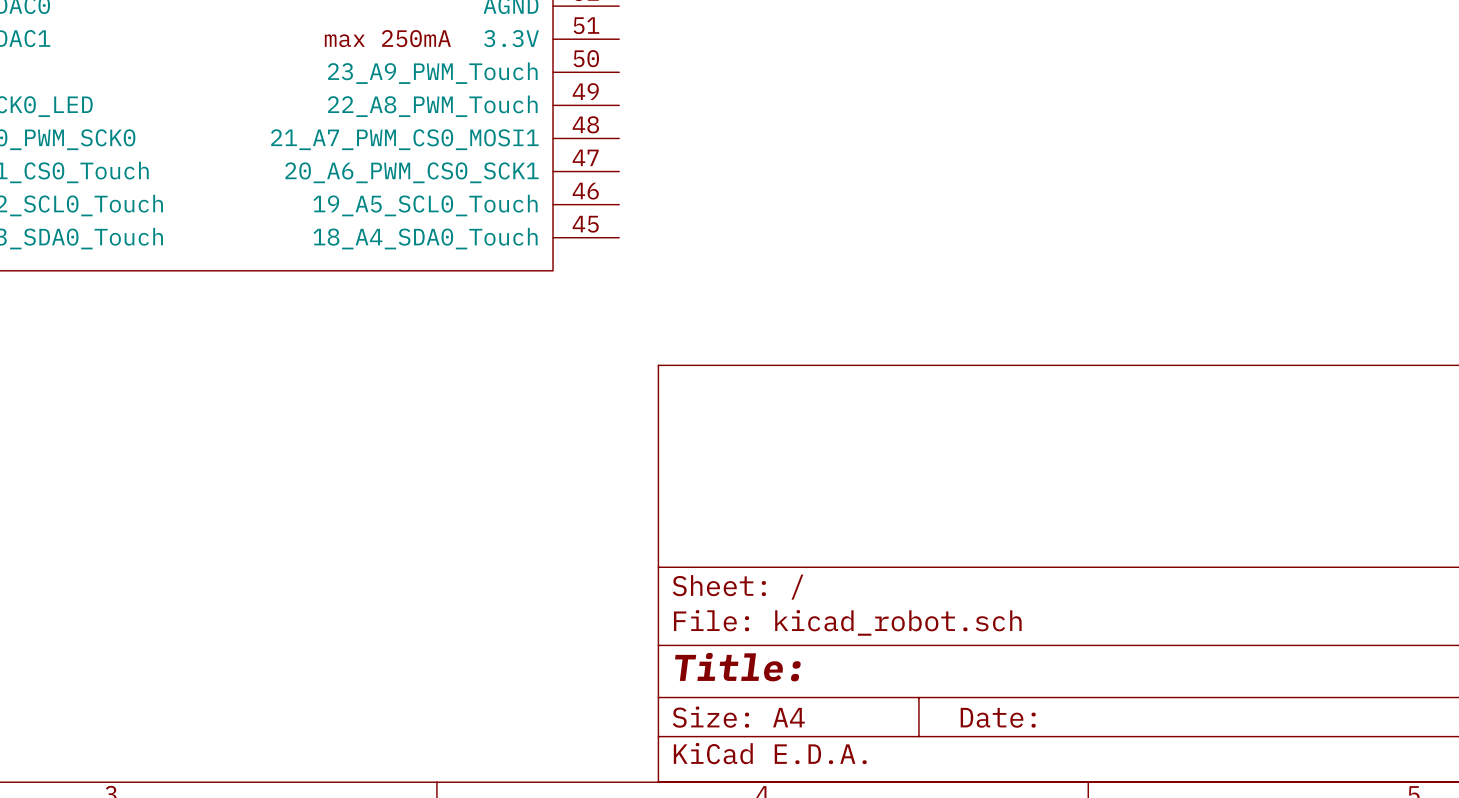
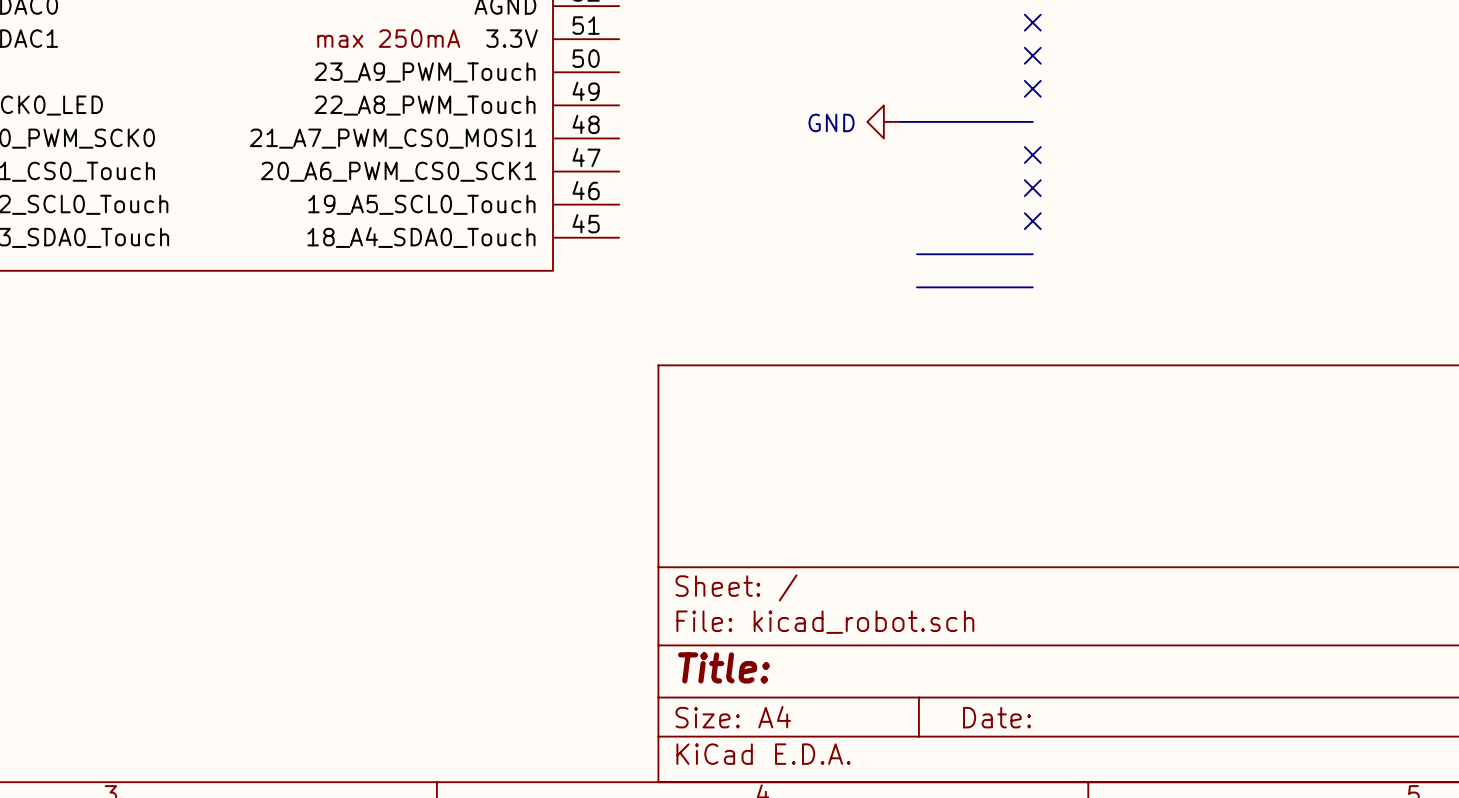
no-connect mark: none -> (1032, 22)
no-connect mark: none -> (1032, 55)
no-connect mark: none -> (1032, 88)
power symbol: none -> GND (883, 121)
wire: none -> (900, 121) (1032, 121)
no-connect mark: none -> (1032, 155)
no-connect mark: none -> (1032, 188)
no-connect mark: none -> (1032, 221)
wire: none -> (916, 254) (1032, 254)
wire: none -> (916, 287) (1032, 287)

